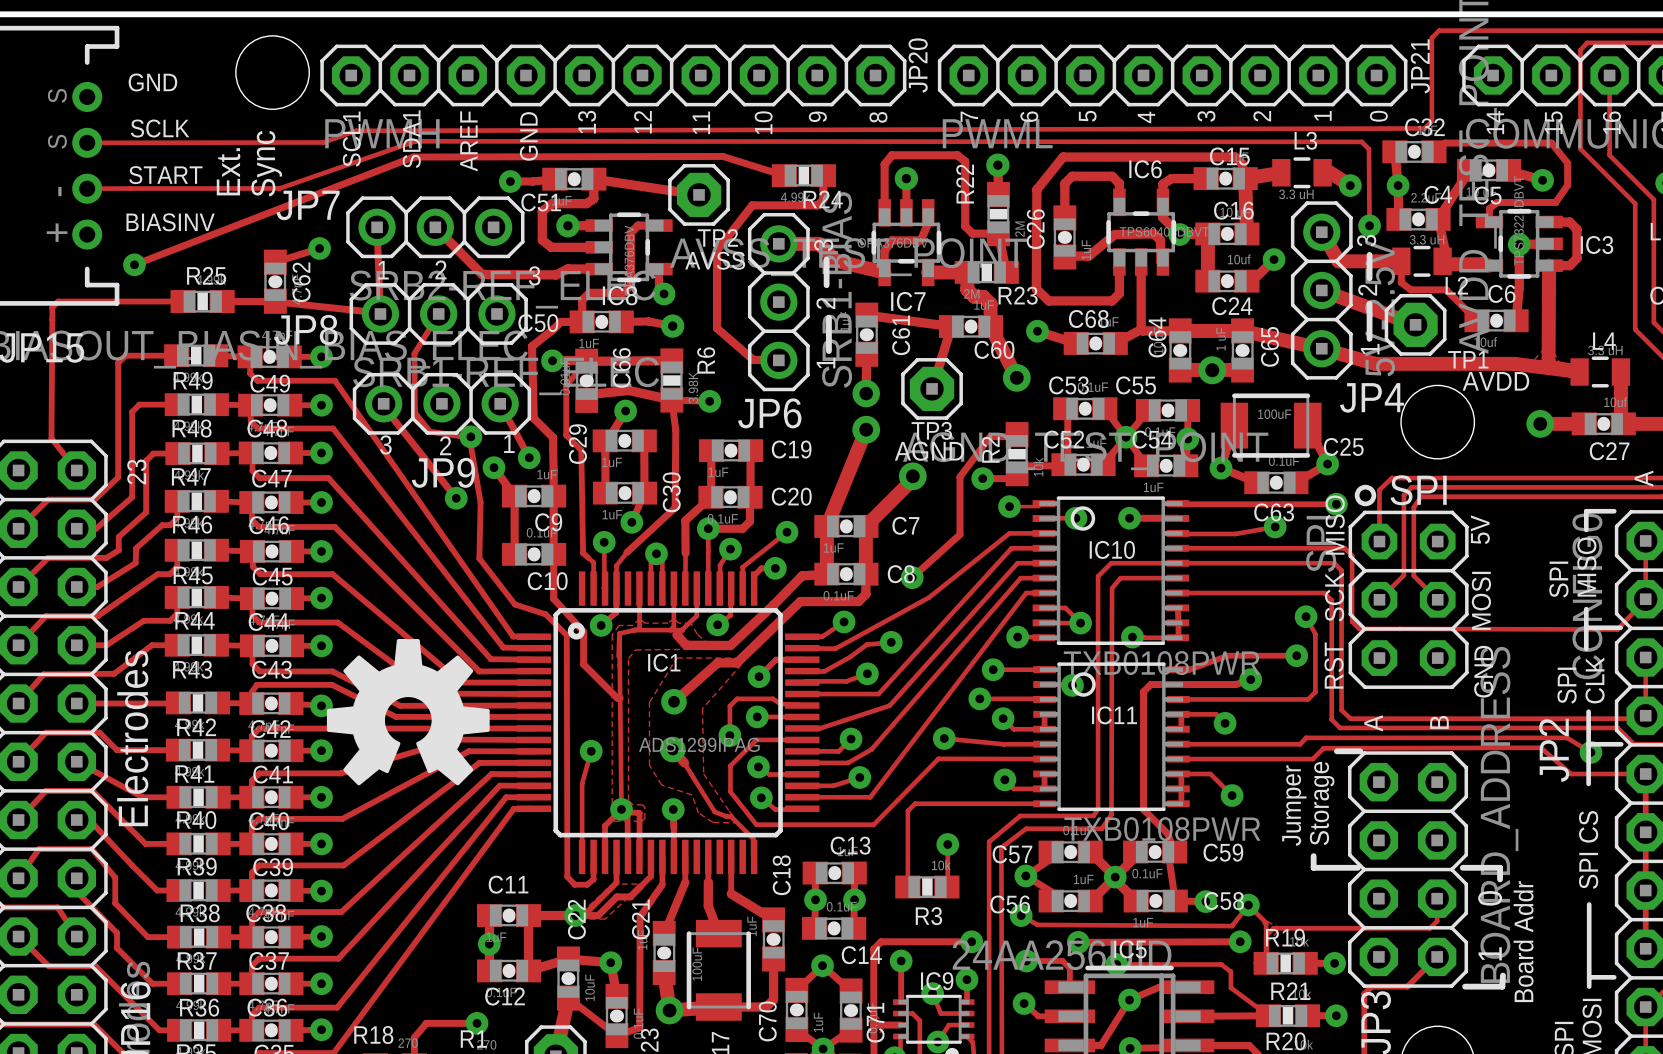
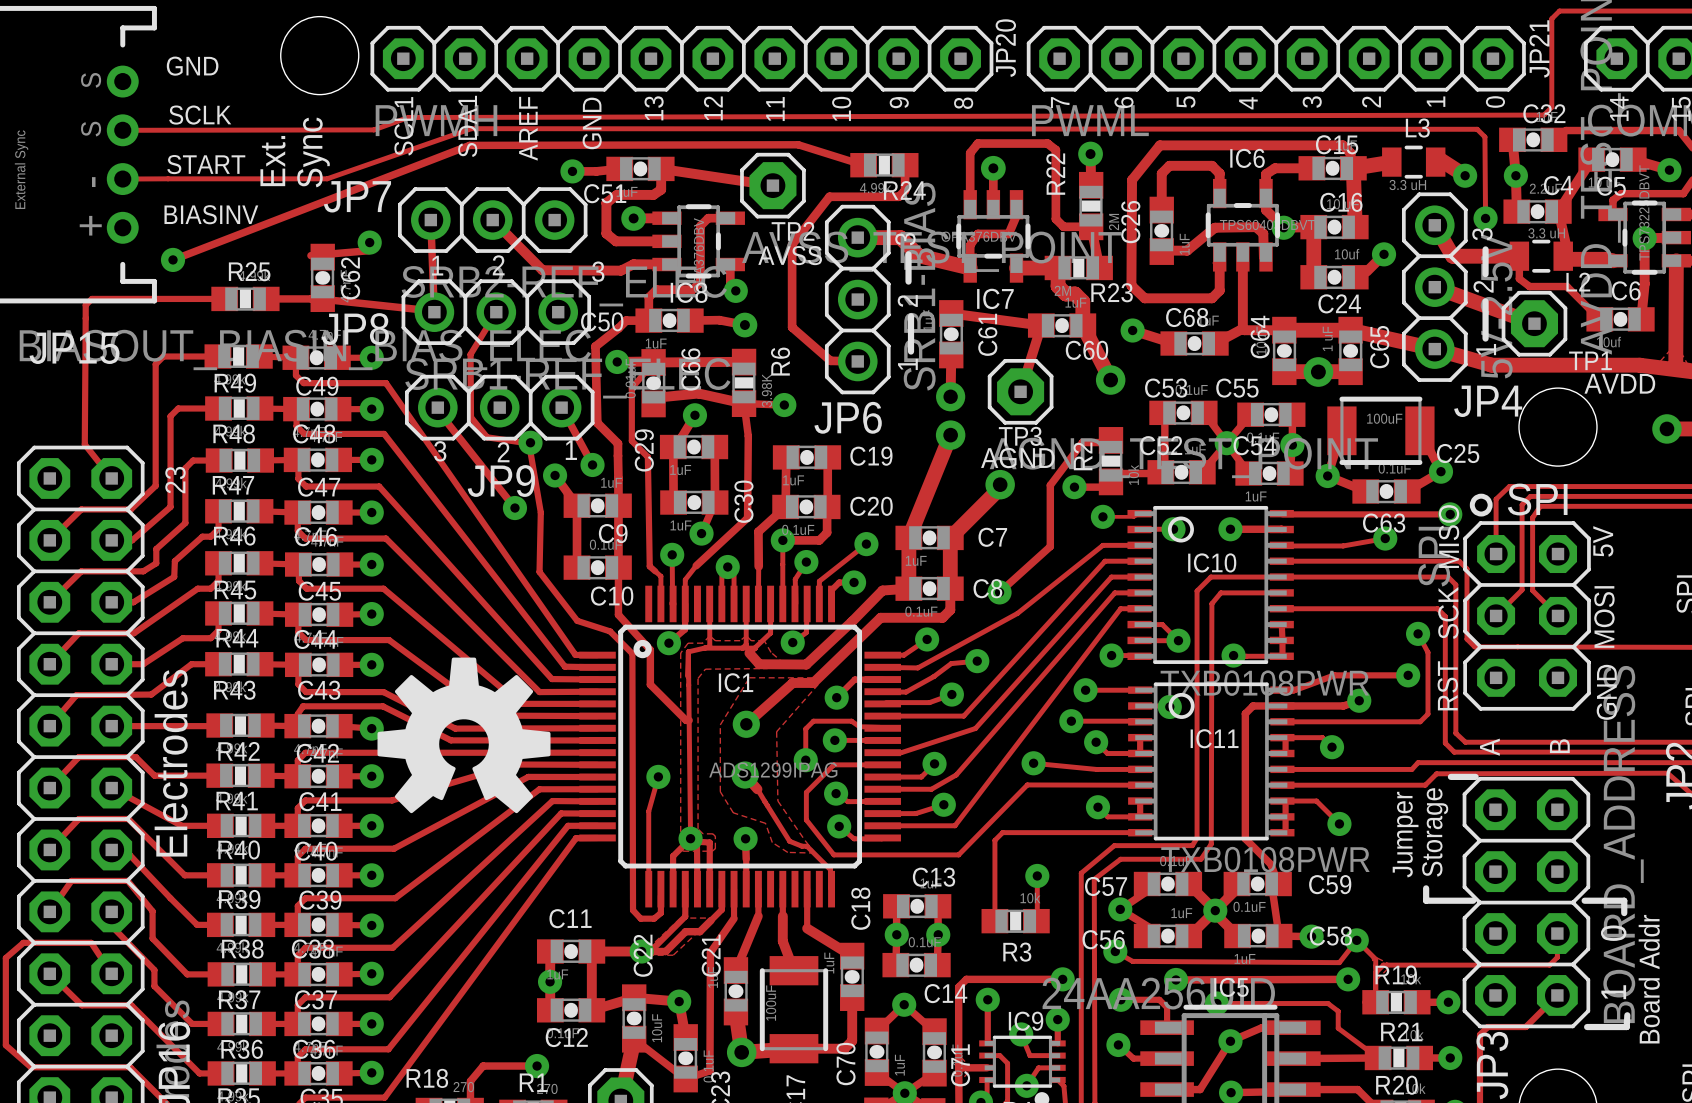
track: (319, 248) (275, 262) -> none
track: none -> (368, 250) (310, 255)

